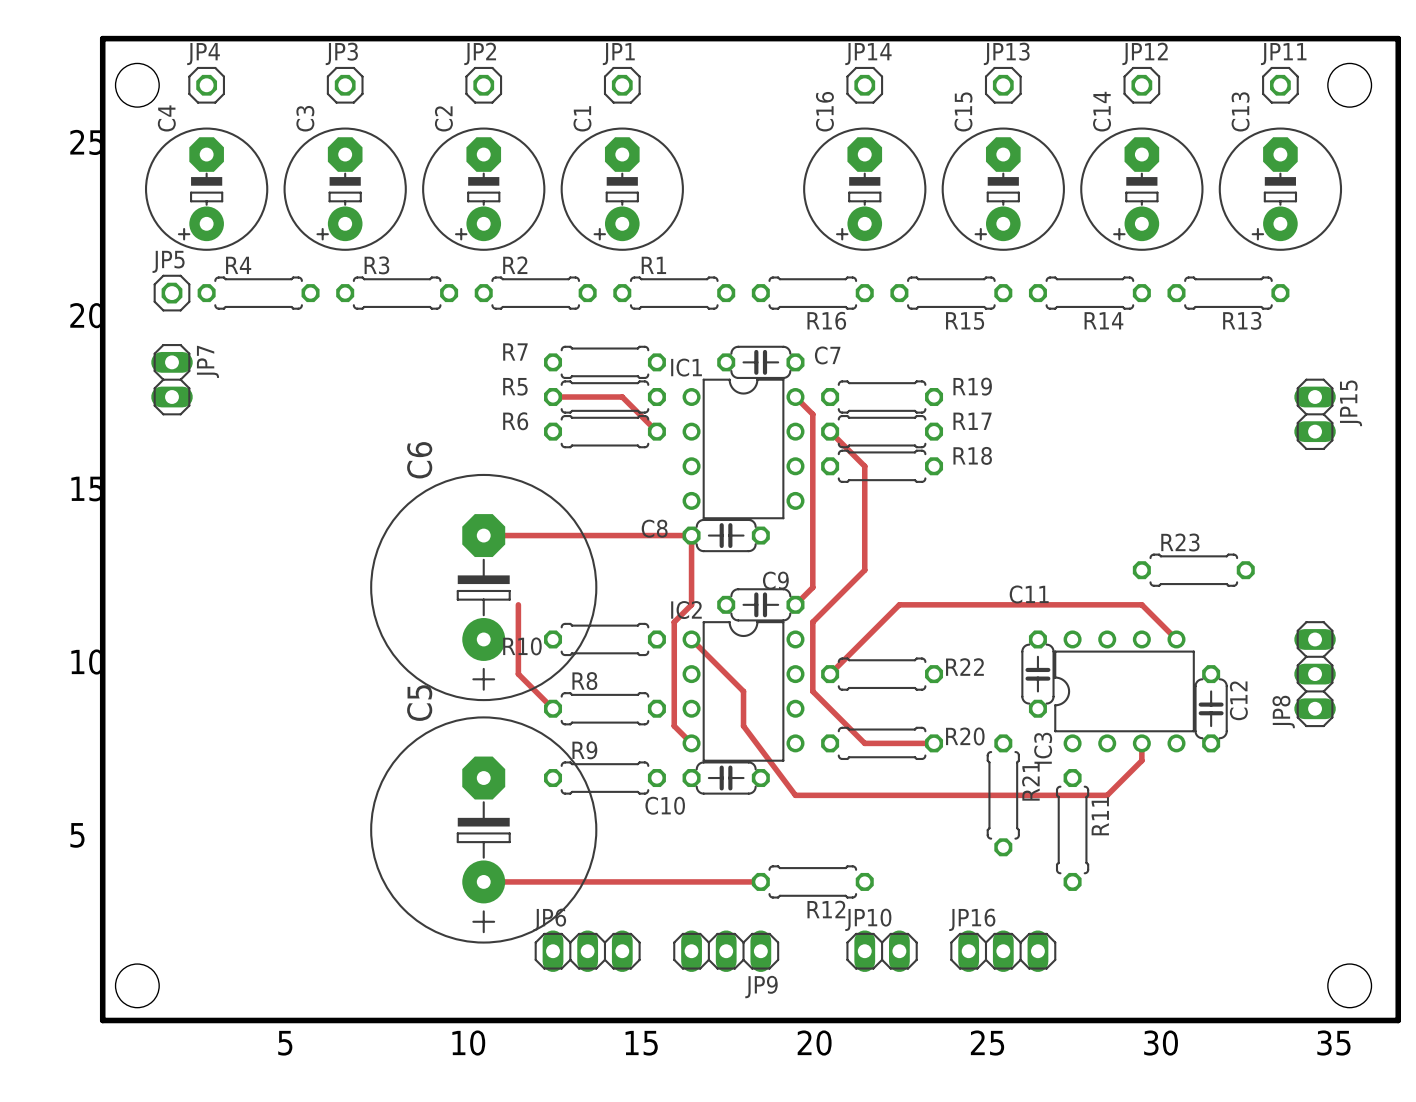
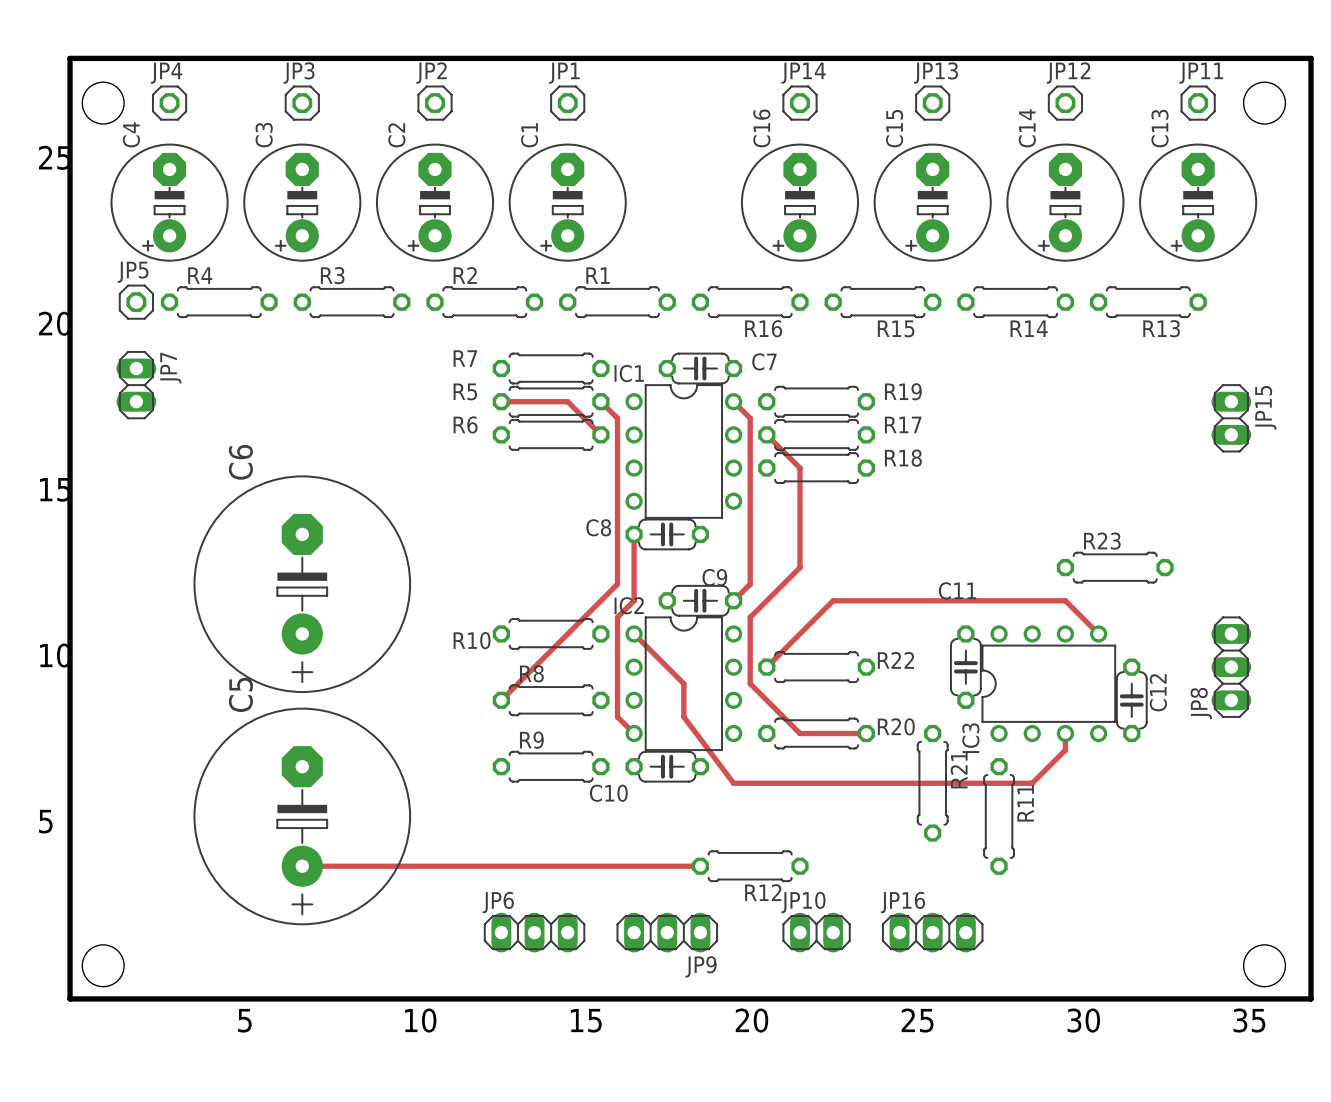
track: (483, 535) (691, 535) -> none
C6 position: (483, 587) -> (302, 584)
track: (518, 604) (518, 674) (553, 708) -> (600, 401) (617, 418) (617, 584) (501, 700)
C5 position: (483, 829) -> (302, 816)
track: none -> (302, 866) (435, 866)

